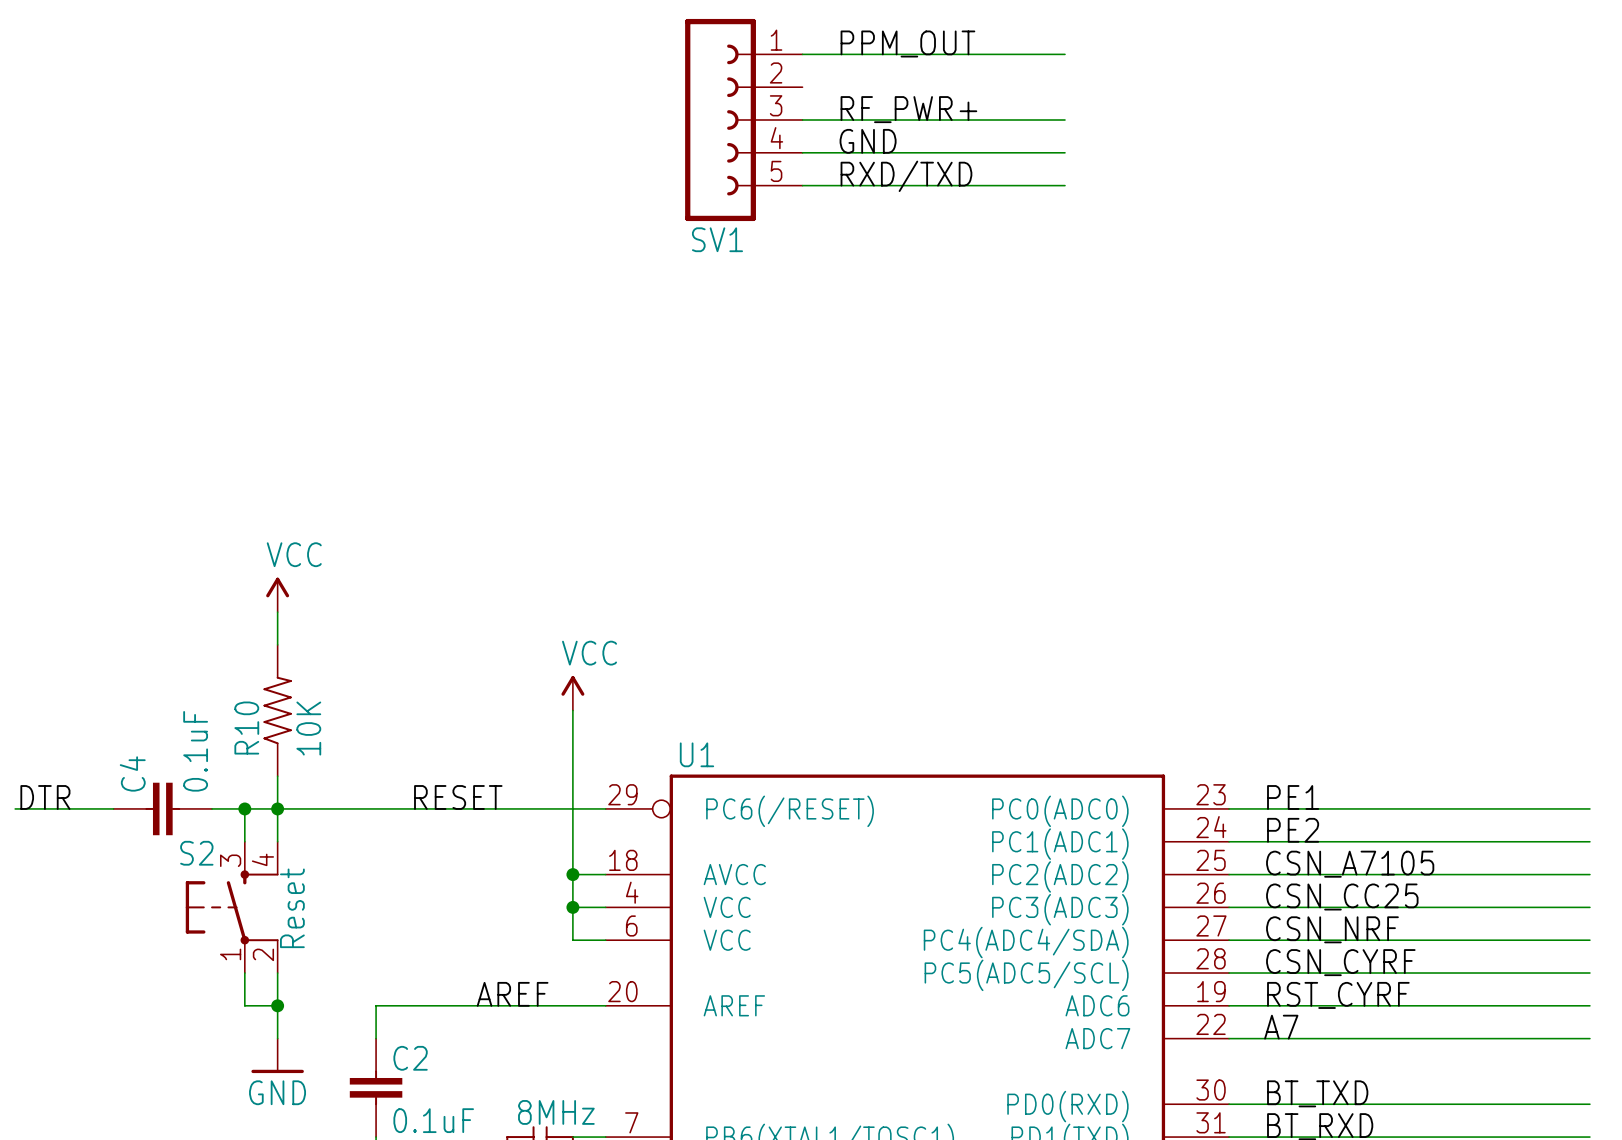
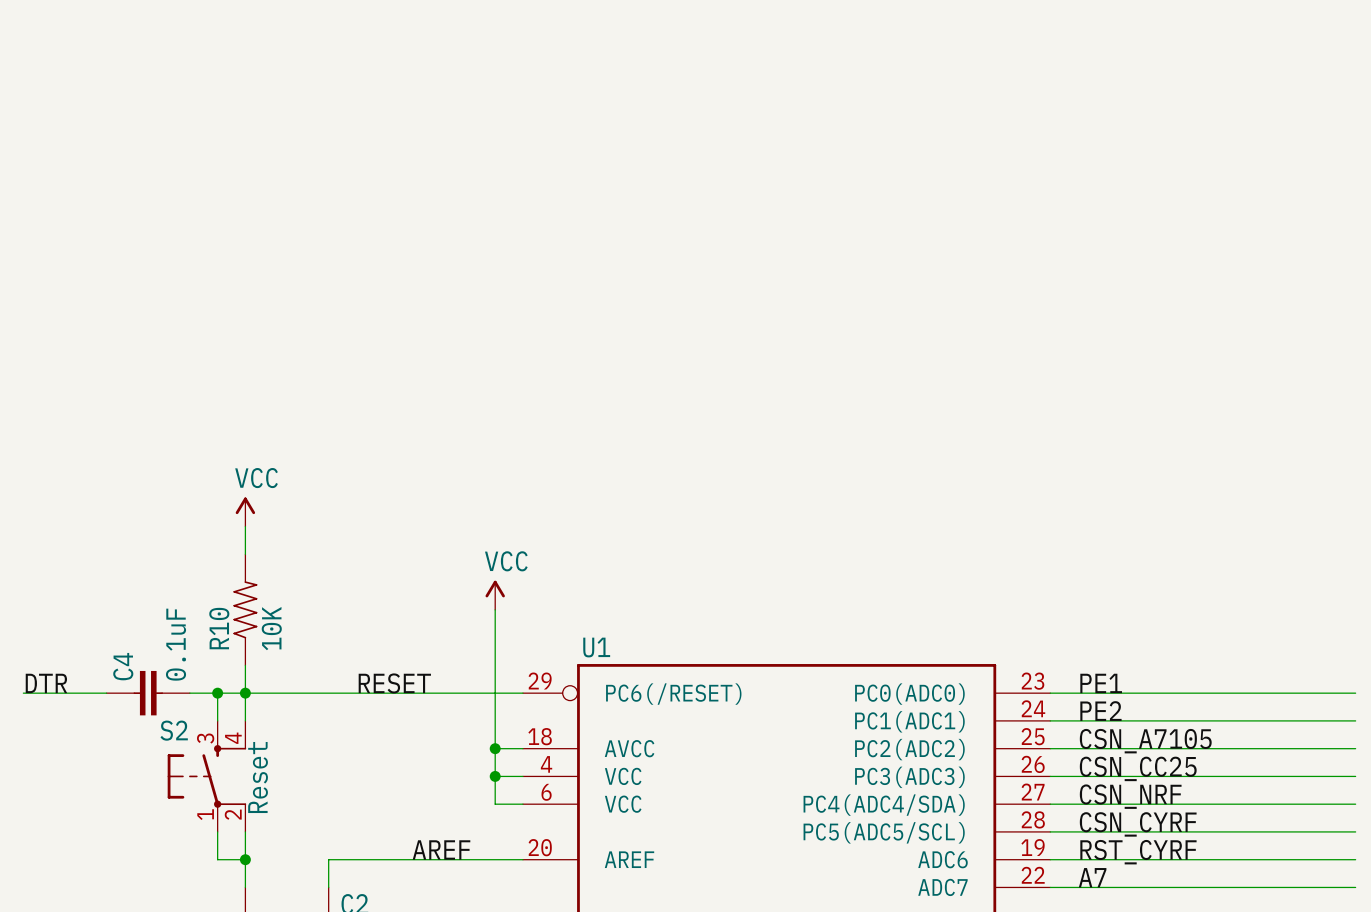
label: PPM_OUT (907, 43) -> none
wire: (802, 54) (1065, 54) -> none
label: RF_PWR+ (908, 109) -> none
SV1: (743, 120) -> none
wire: (802, 120) (1065, 120) -> none
label: GND (868, 141) -> none
wire: (802, 152) (1065, 152) -> none
label: RXD/TXD (906, 176) -> none
wire: (802, 185) (1065, 185) -> none

